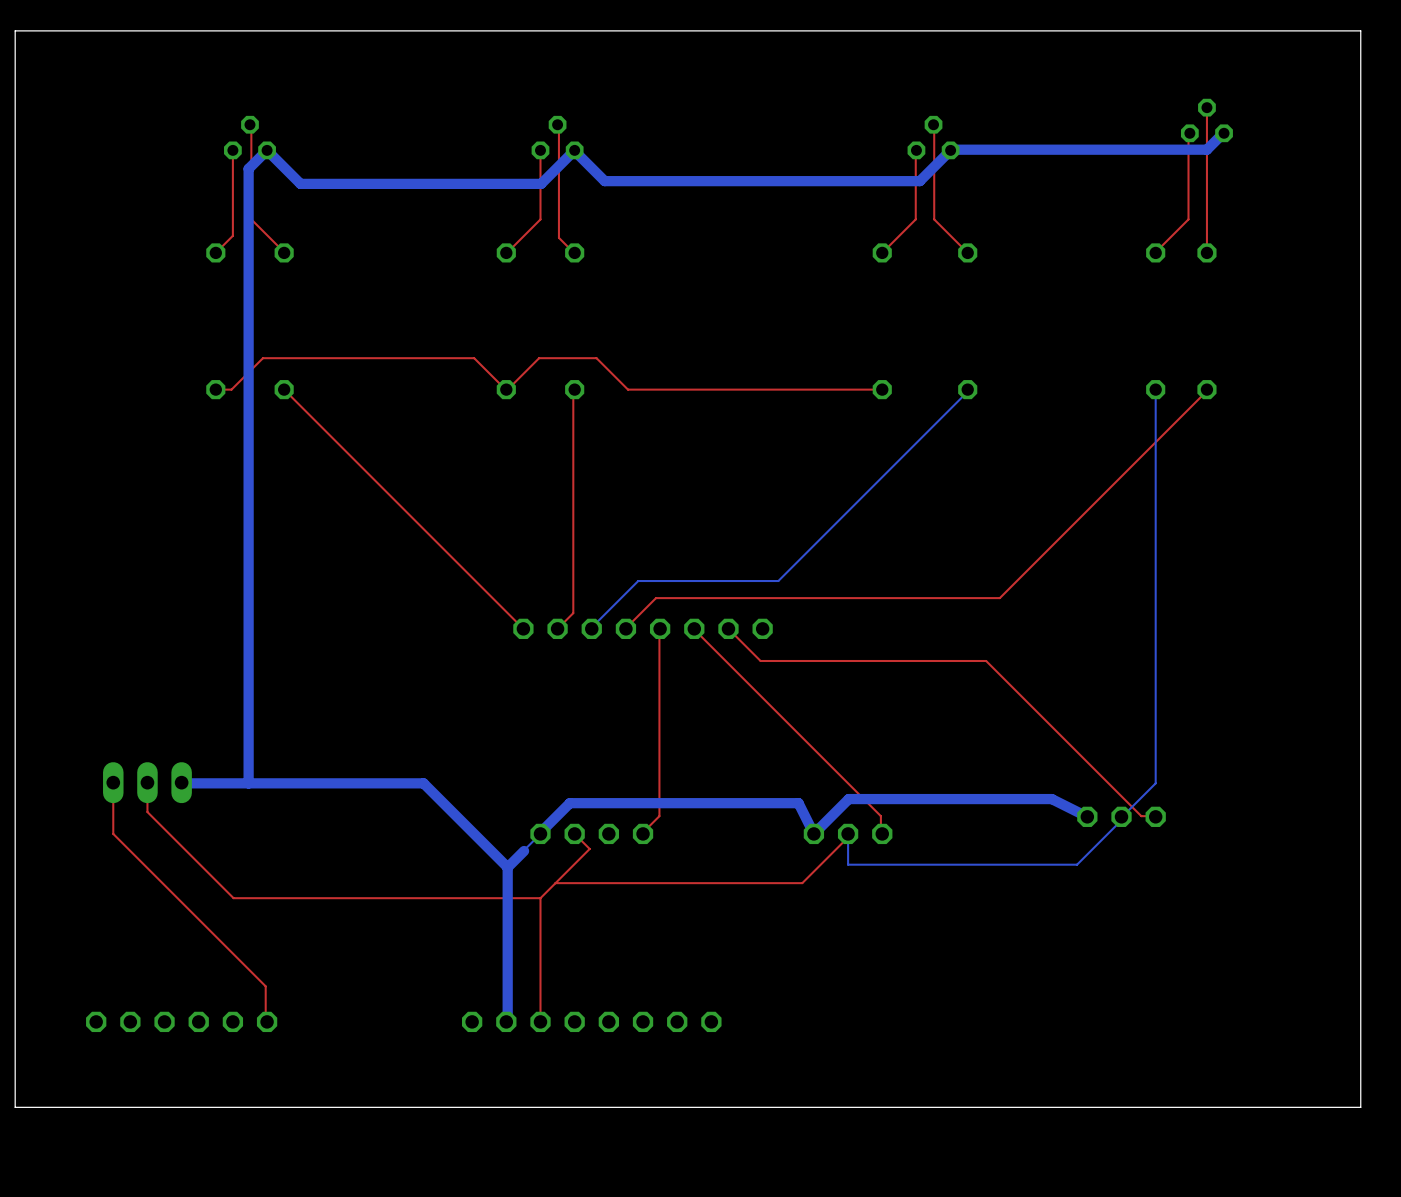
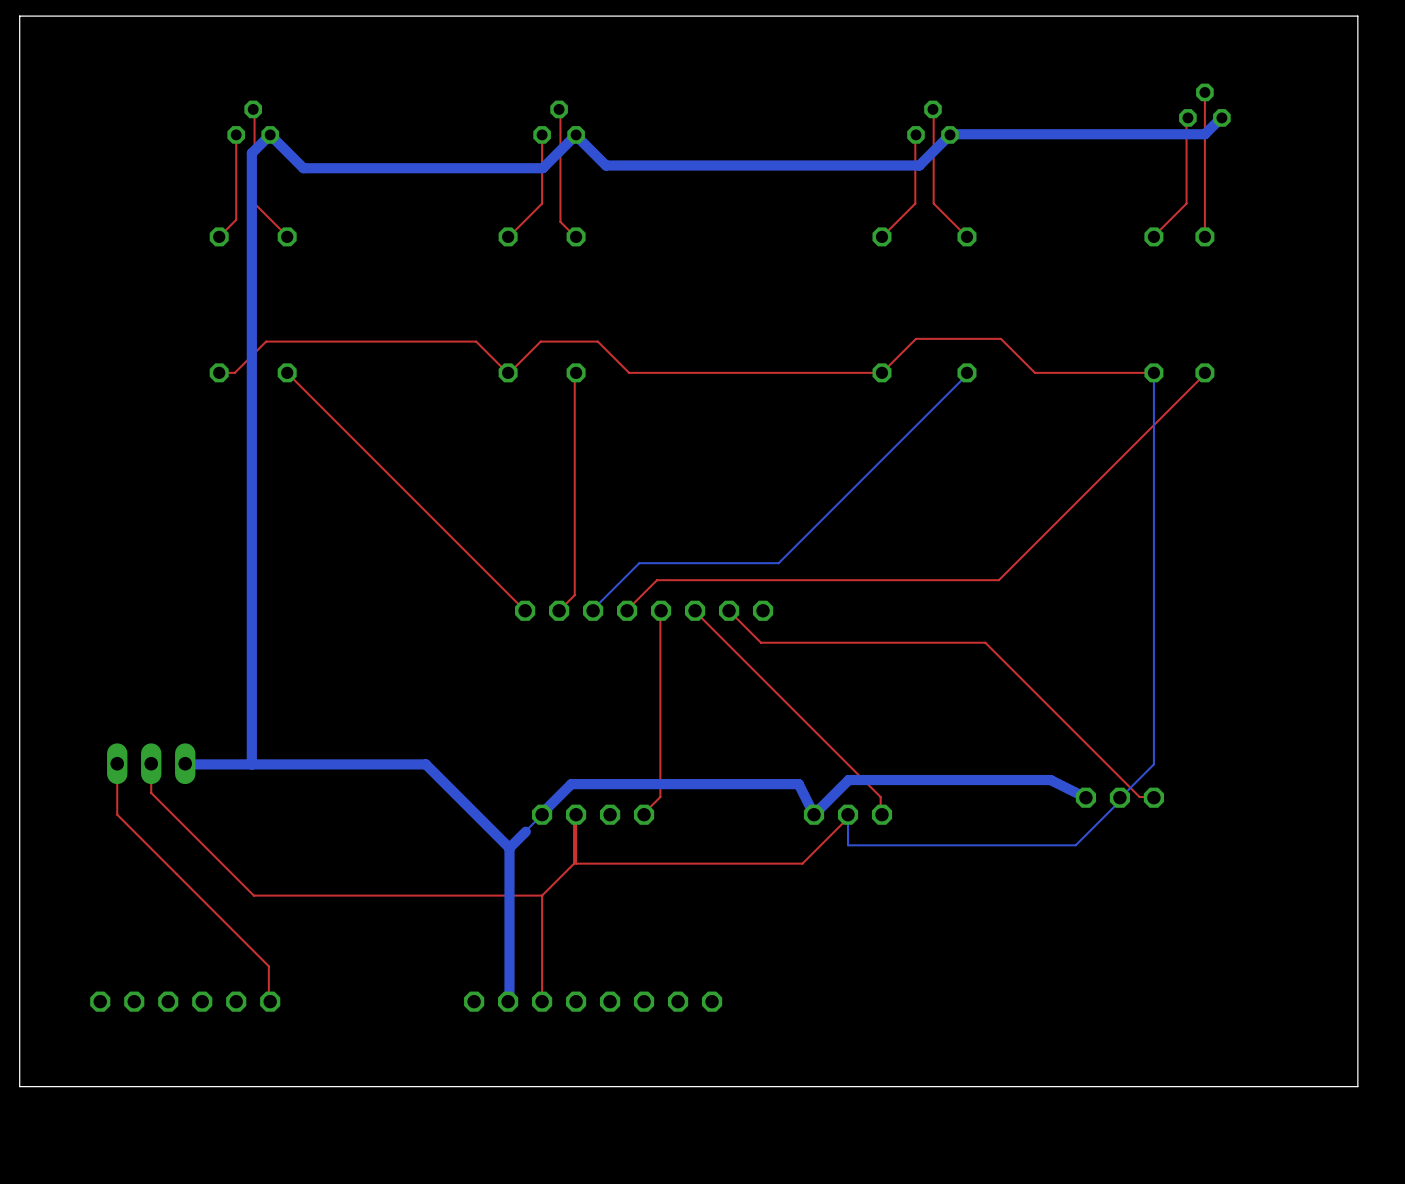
top track: none -> (1153, 372) (1034, 372) (1000, 338) (915, 338) (882, 372)
top track: (574, 833) (589, 848) (540, 898) -> none
top track: (574, 883) (555, 883) -> none
top track: (540, 898) (233, 898) -> (576, 863) (576, 814) (574, 816) (574, 863) (542, 895) (253, 895) (236, 878)
top track: (540, 898) (540, 915) -> none

